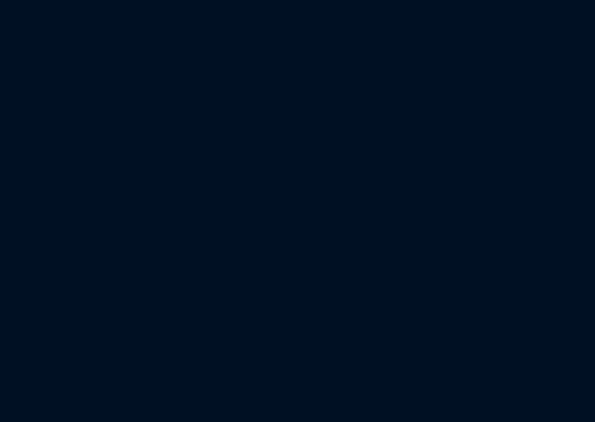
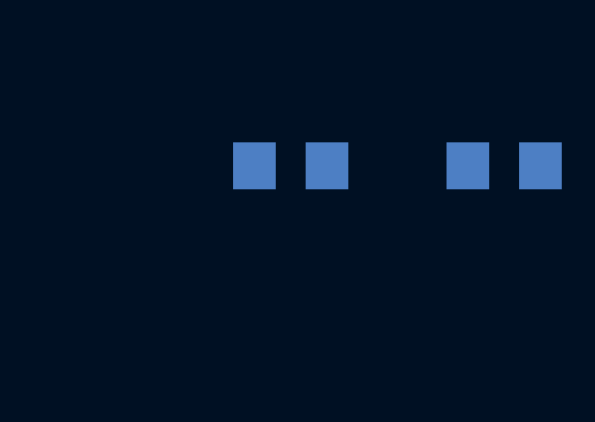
part: none -> (290, 165)
part: none -> (504, 165)

